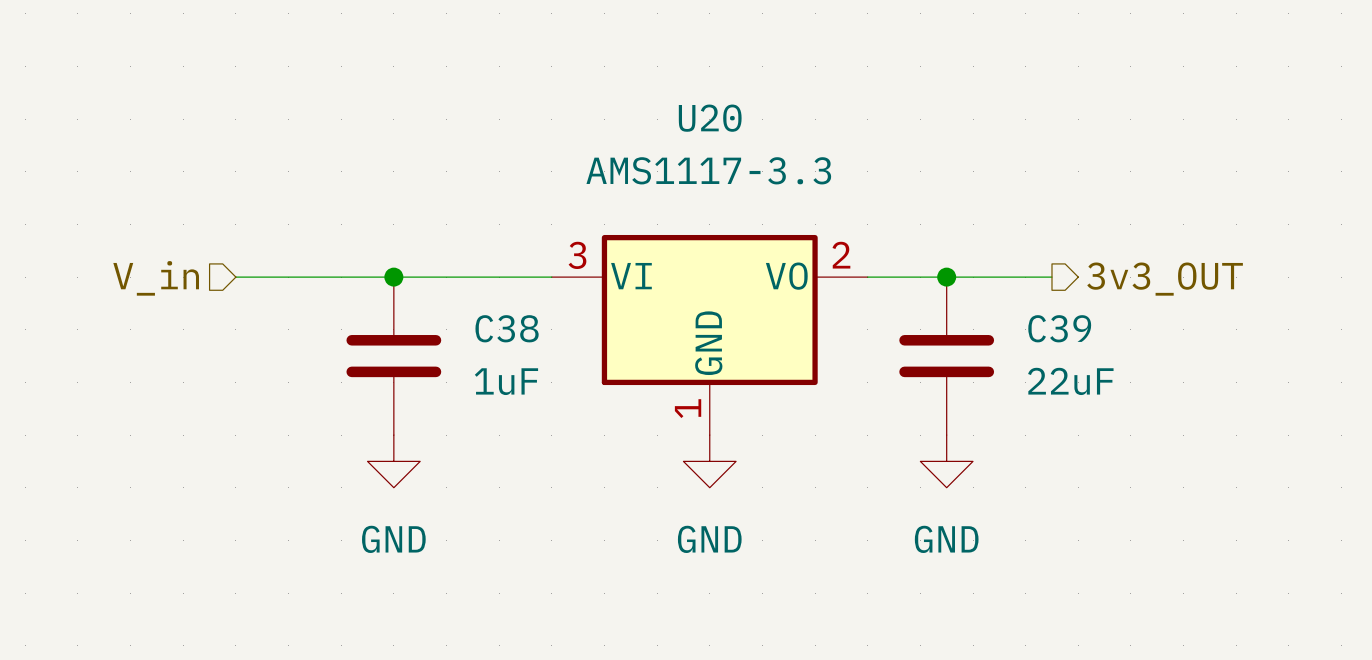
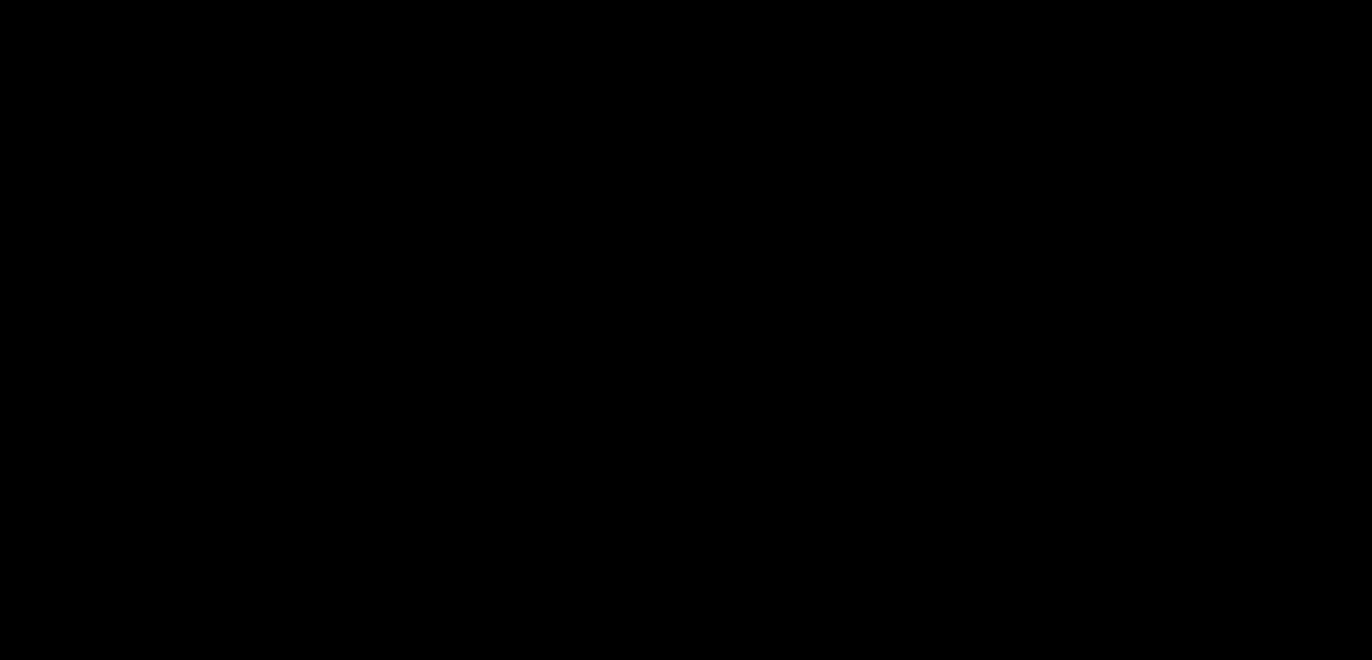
wire: (235, 277) (551, 277) -> none
junction: (393, 277) -> none
wire: (867, 277) (1051, 277) -> none
junction: (946, 277) -> none
hierarchical label: V_in (156, 278) -> none
hierarchical label: 3v3_OUT (1165, 279) -> none
U20: AMS1117-3.3 (709, 335) -> none
C38: 1uF (393, 356) -> none
C39: 22uF (946, 356) -> none
power symbol: GND (393, 461) -> none
power symbol: GND (709, 461) -> none
power symbol: GND (946, 461) -> none

